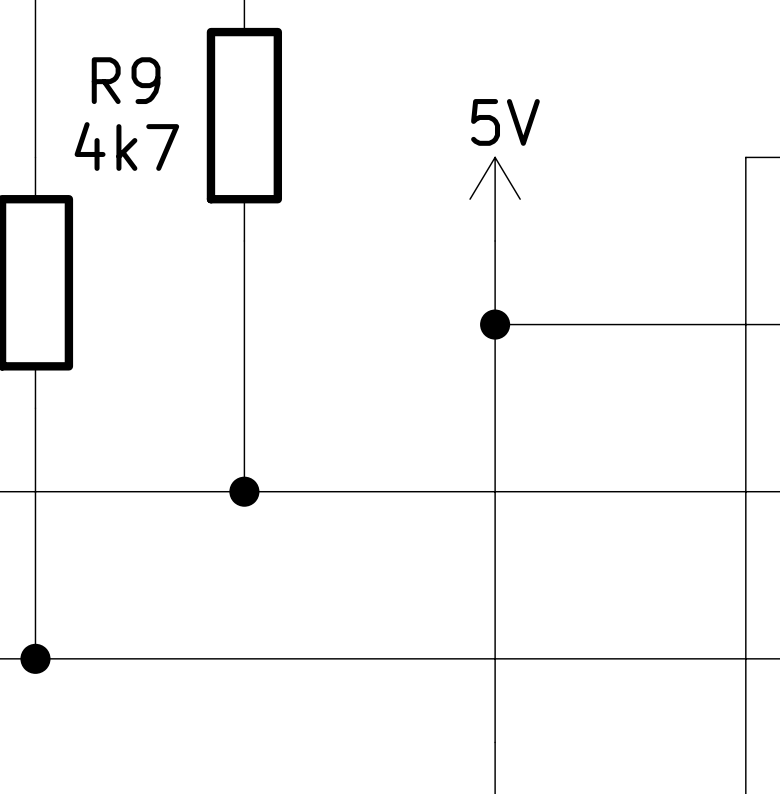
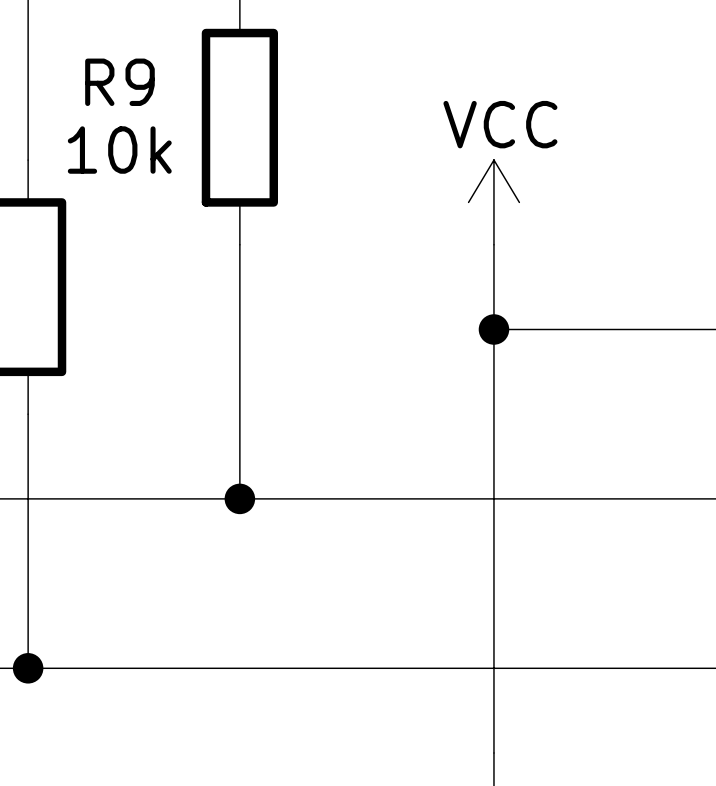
R9 value: 4k7 (126, 146) -> 10k (119, 150)
power symbol: 5V (495, 199) -> VCC (493, 202)

